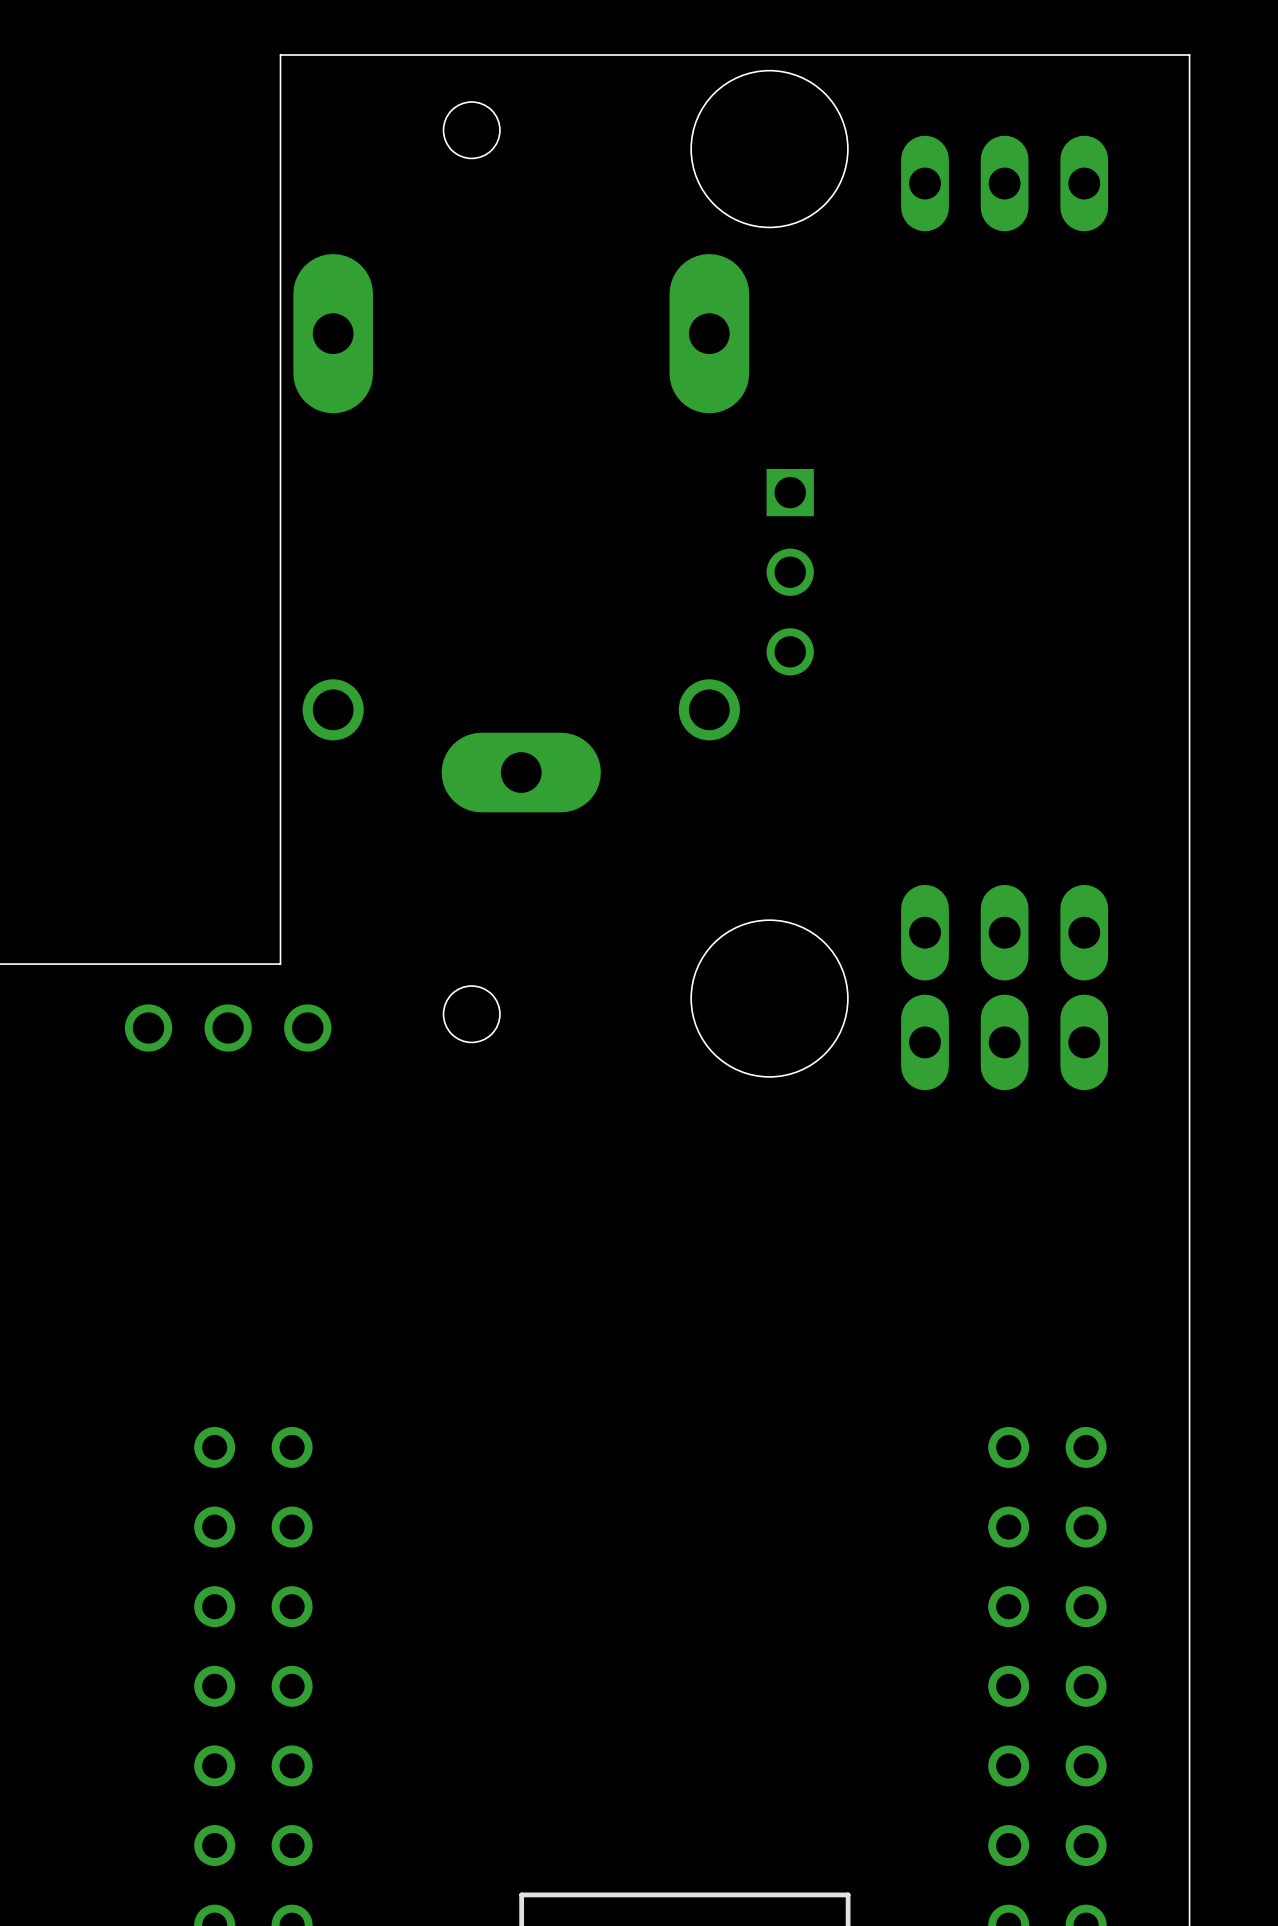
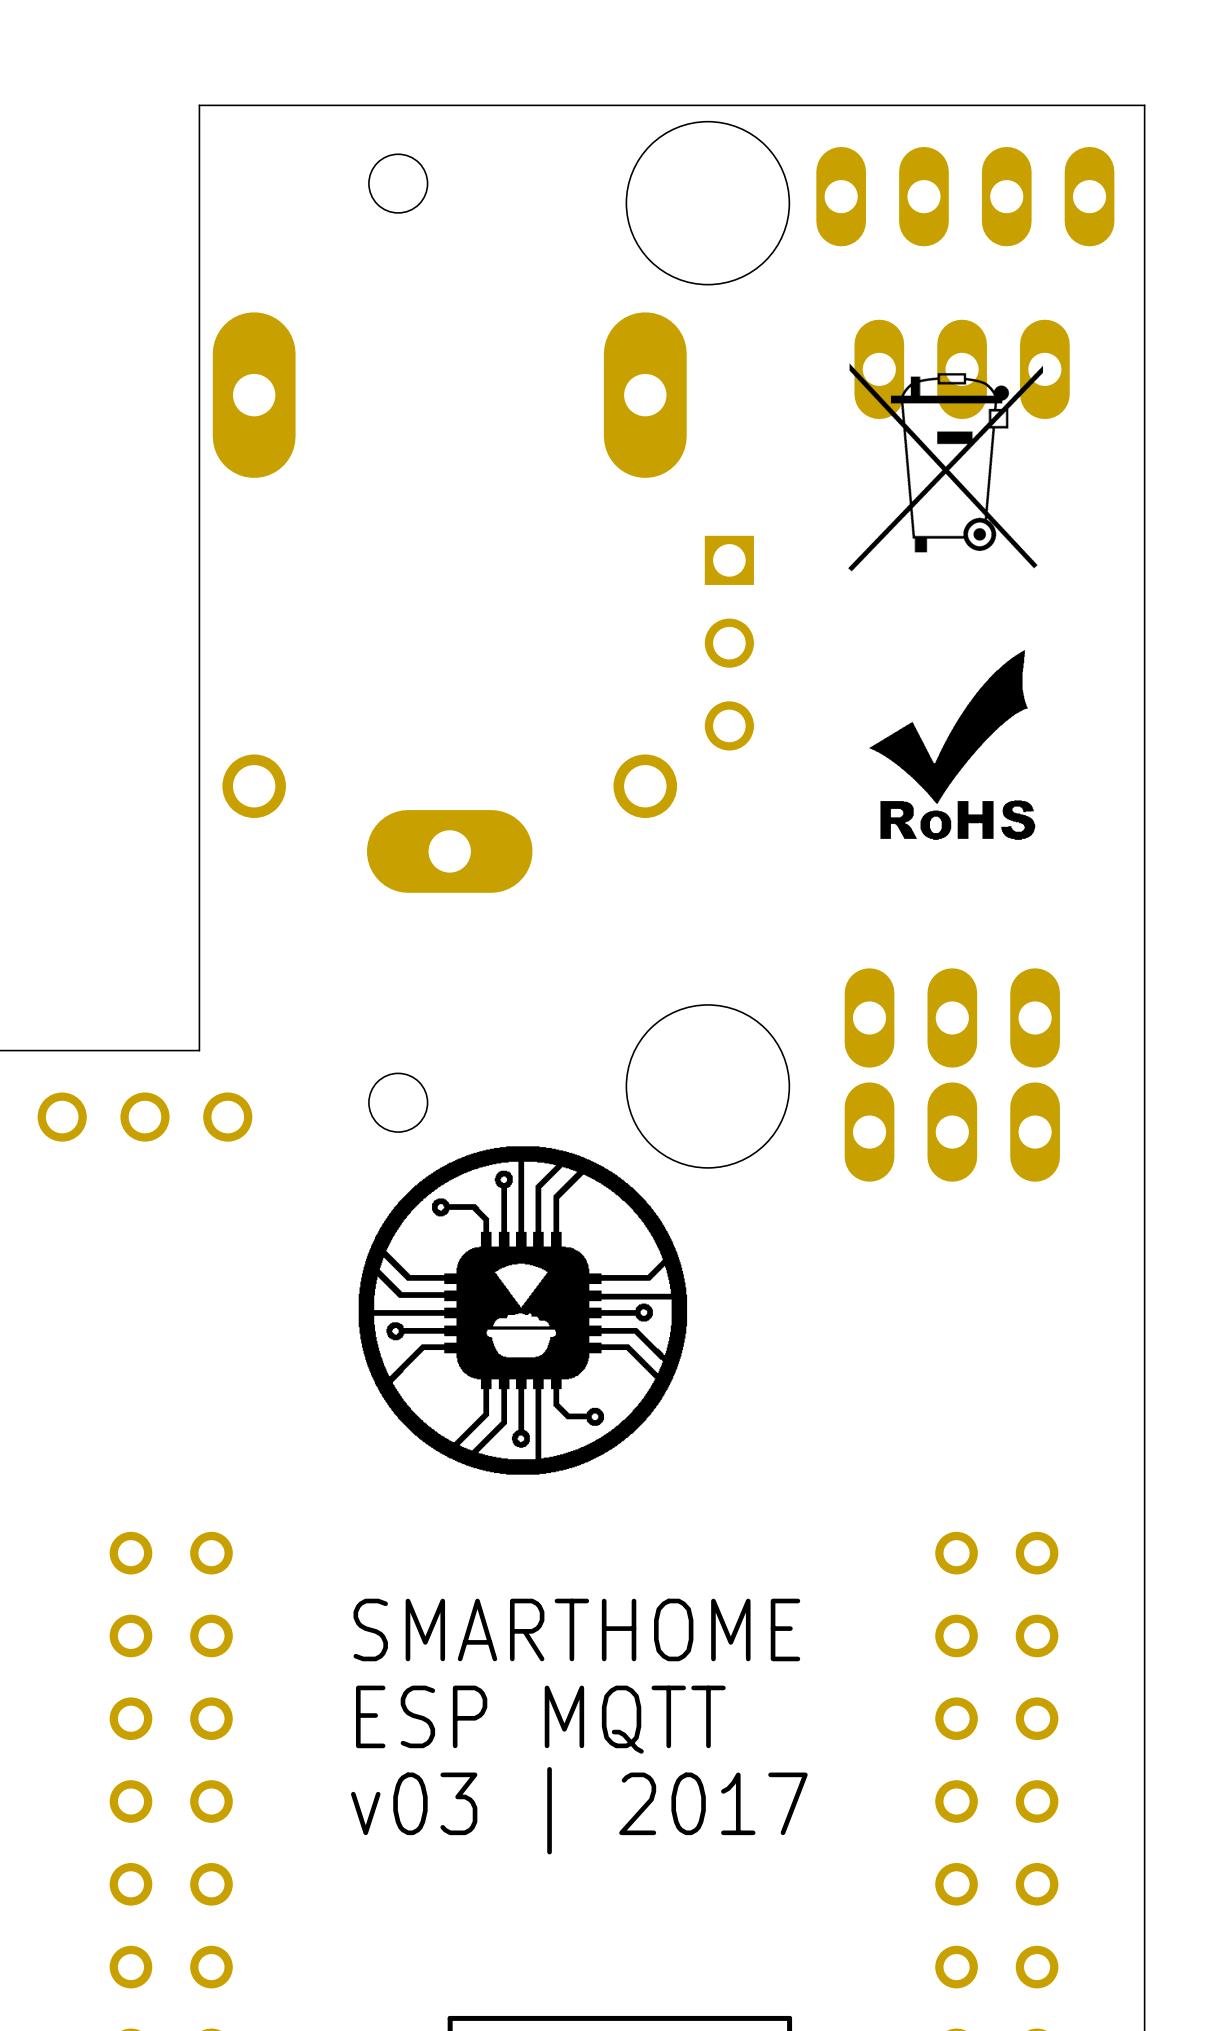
part: none -> (965, 196)
part position: (1004, 183) -> (962, 369)
drawing: none -> [848, 363, 1044, 572]
drawing: none -> [869, 650, 1036, 840]
drawing: none -> [358, 1146, 688, 1475]
text: none -> SMARTHOME (576, 1629)
text: none -> ESP MQTT (540, 1719)
text: none -> v03 | 2017 (579, 1810)

